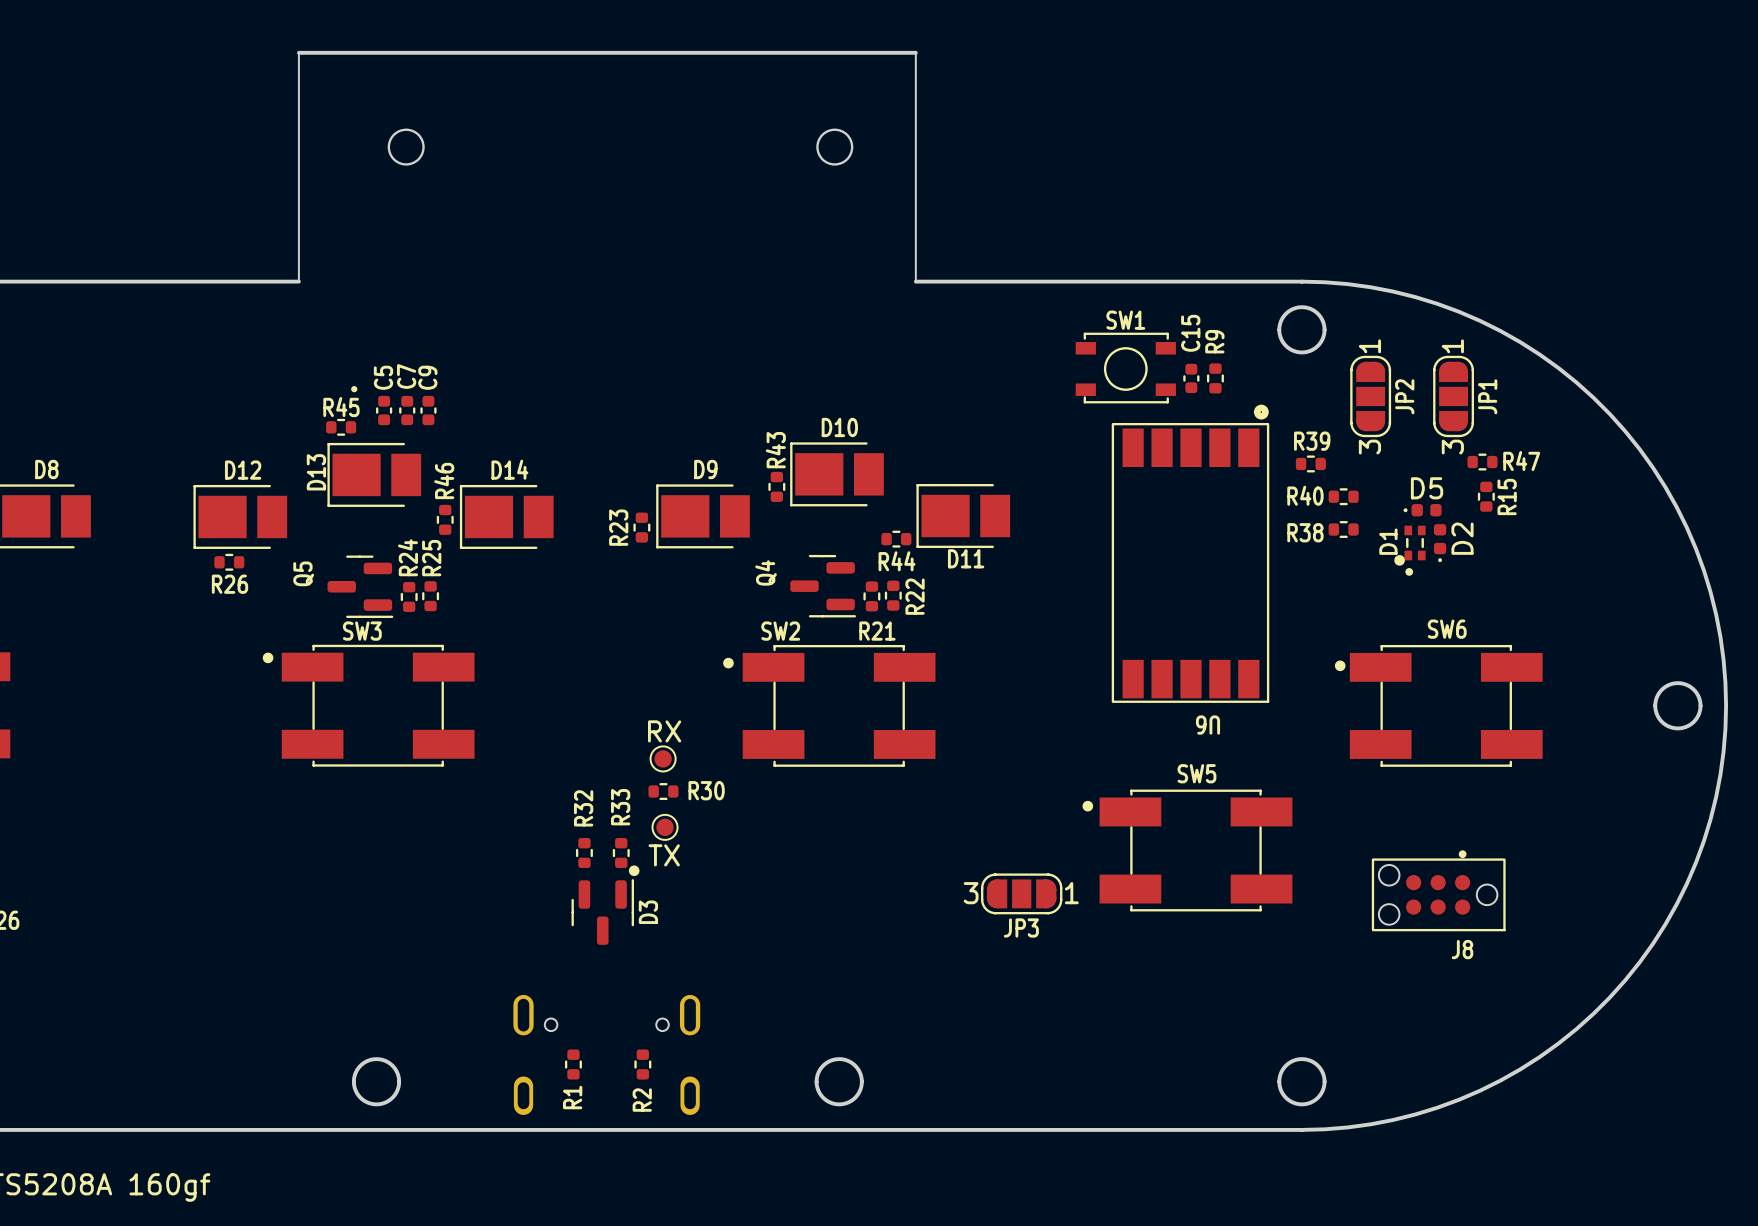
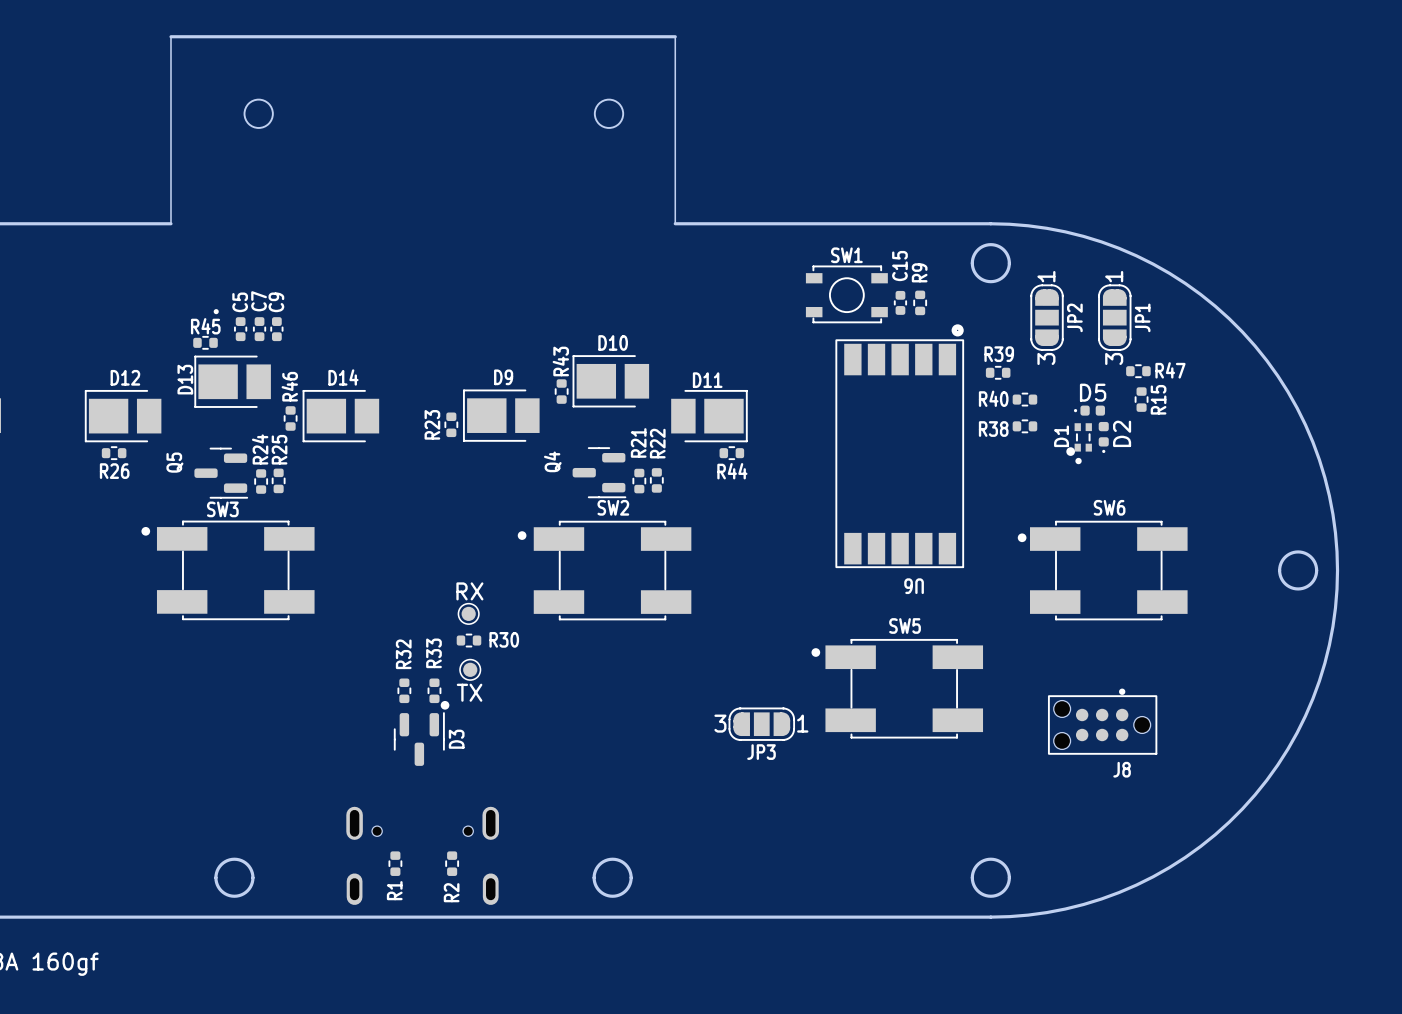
D11 rotation: 0° (963, 516) -> 180° (709, 416)
R44 position: (896, 539) -> (731, 453)
R22 name position: R22 (915, 596) -> R22 (657, 443)
SW2 name position: SW2 (780, 631) -> SW2 (613, 507)
R21 name rotation: 0° (877, 631) -> 90° counterclockwise (638, 442)
R21 name position: R21 (877, 631) -> R21 (638, 442)

